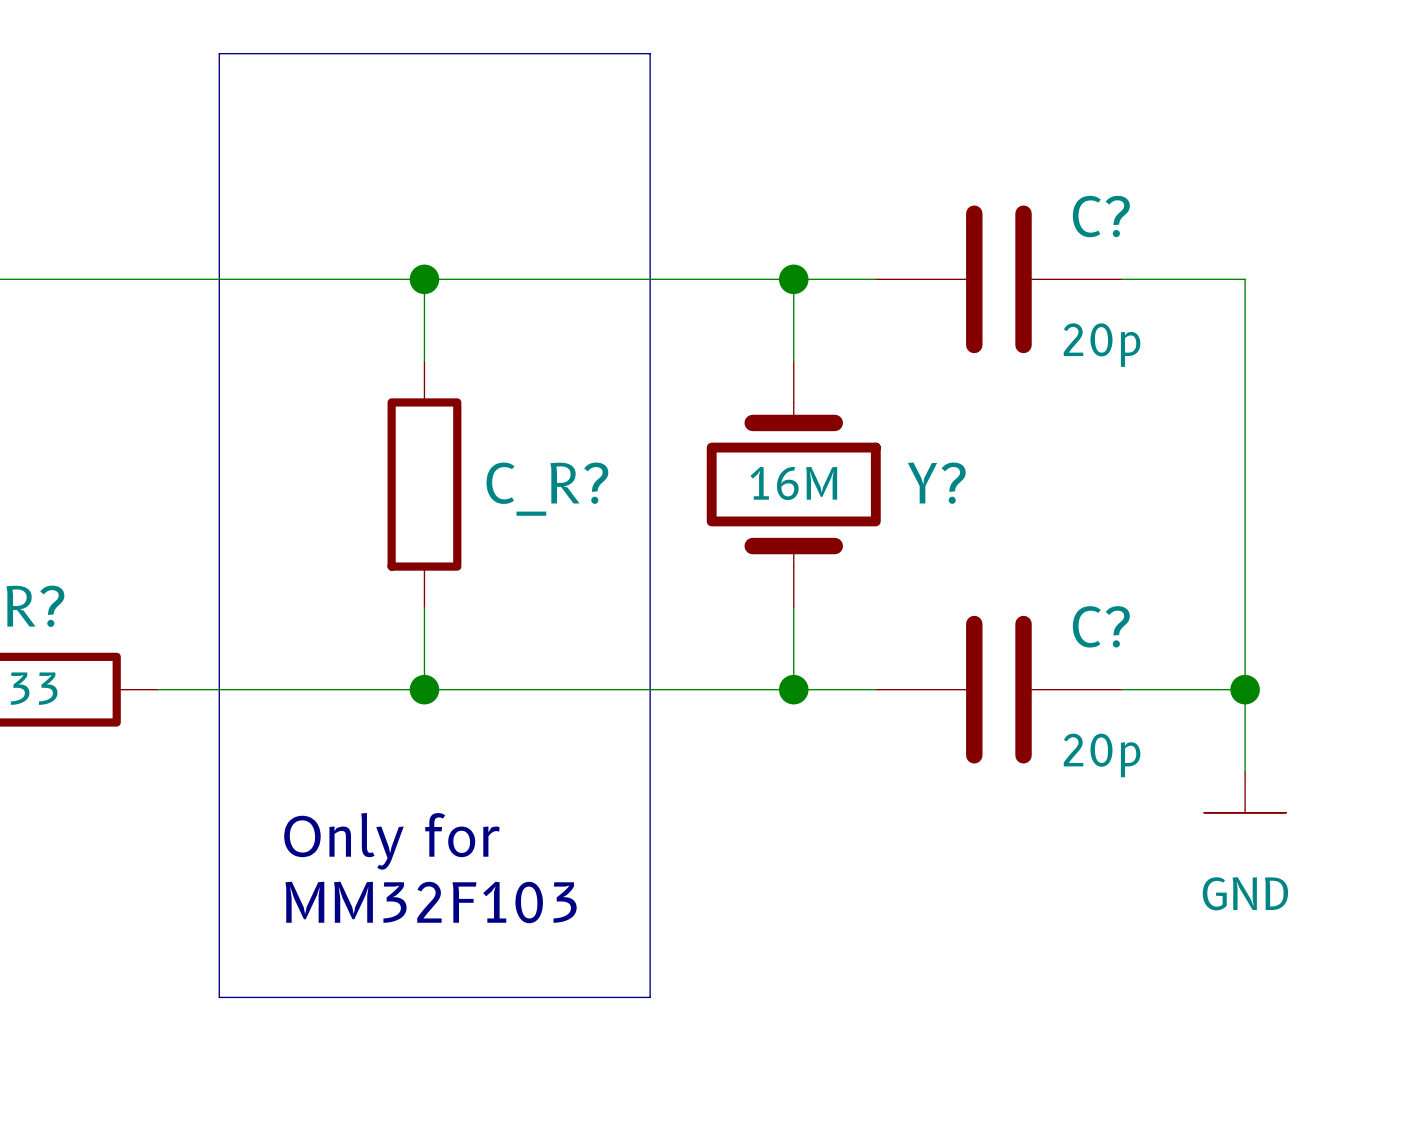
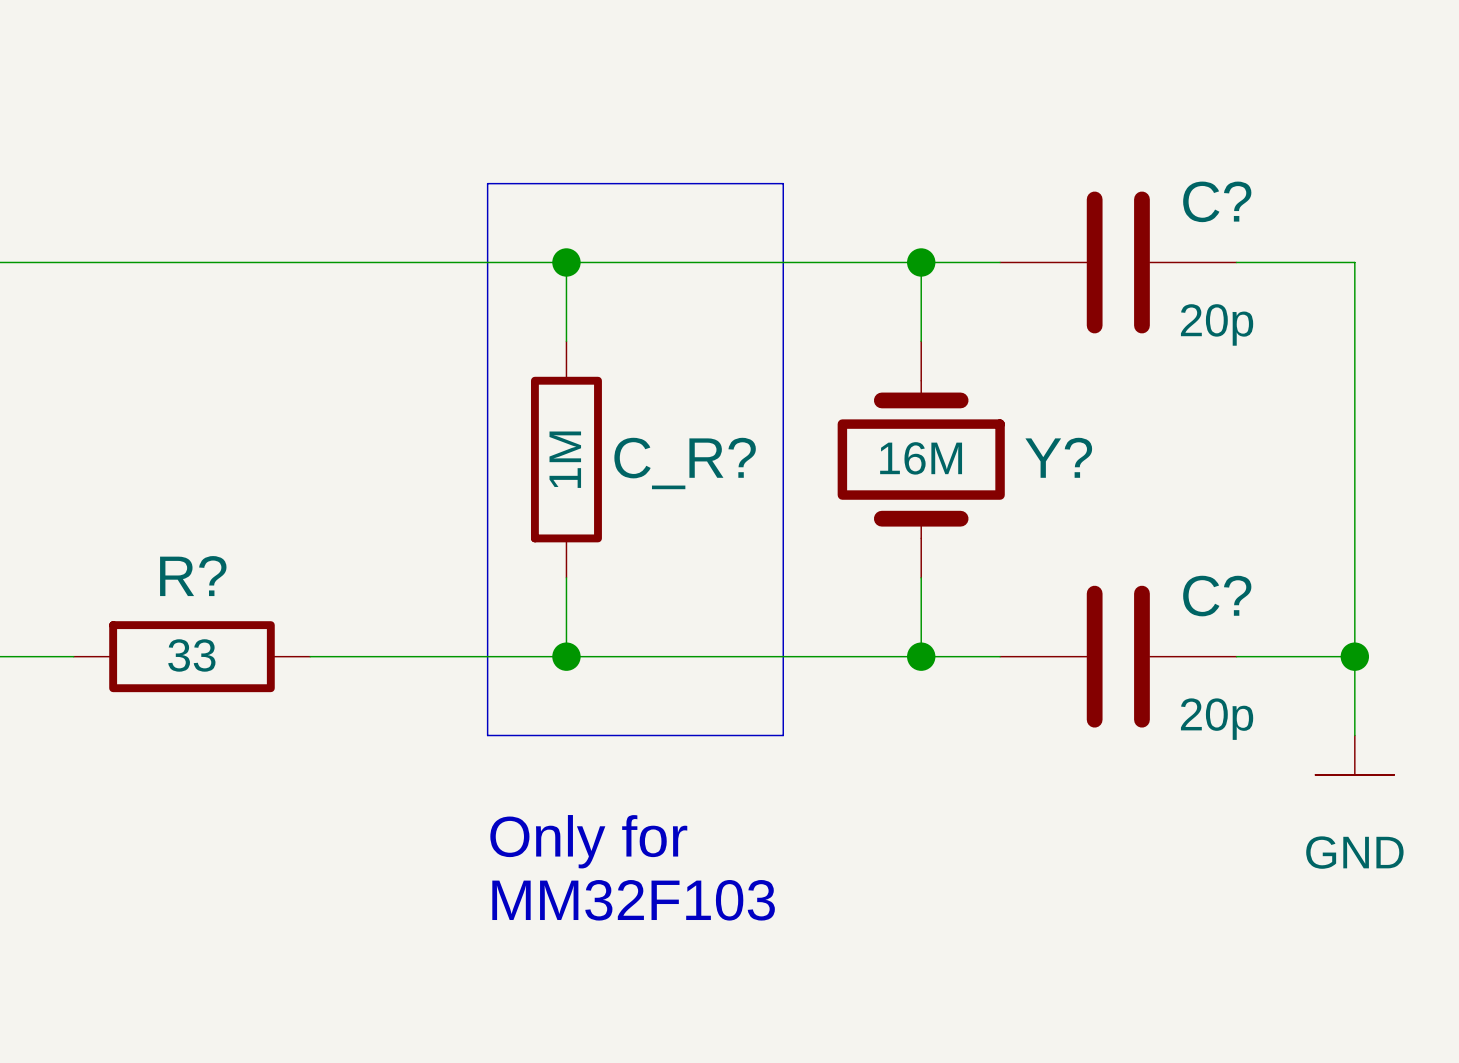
line: (650, 197) (650, 53) (219, 53) (219, 997) (650, 997) (650, 771) -> (783, 183) (487, 183) (487, 735) (783, 735)
C_R? value: none -> 1M (565, 459)
text position: Only for (391, 841) -> Only for (588, 841)
text position: MM32F103 (431, 902) -> MM32F103 (633, 900)

